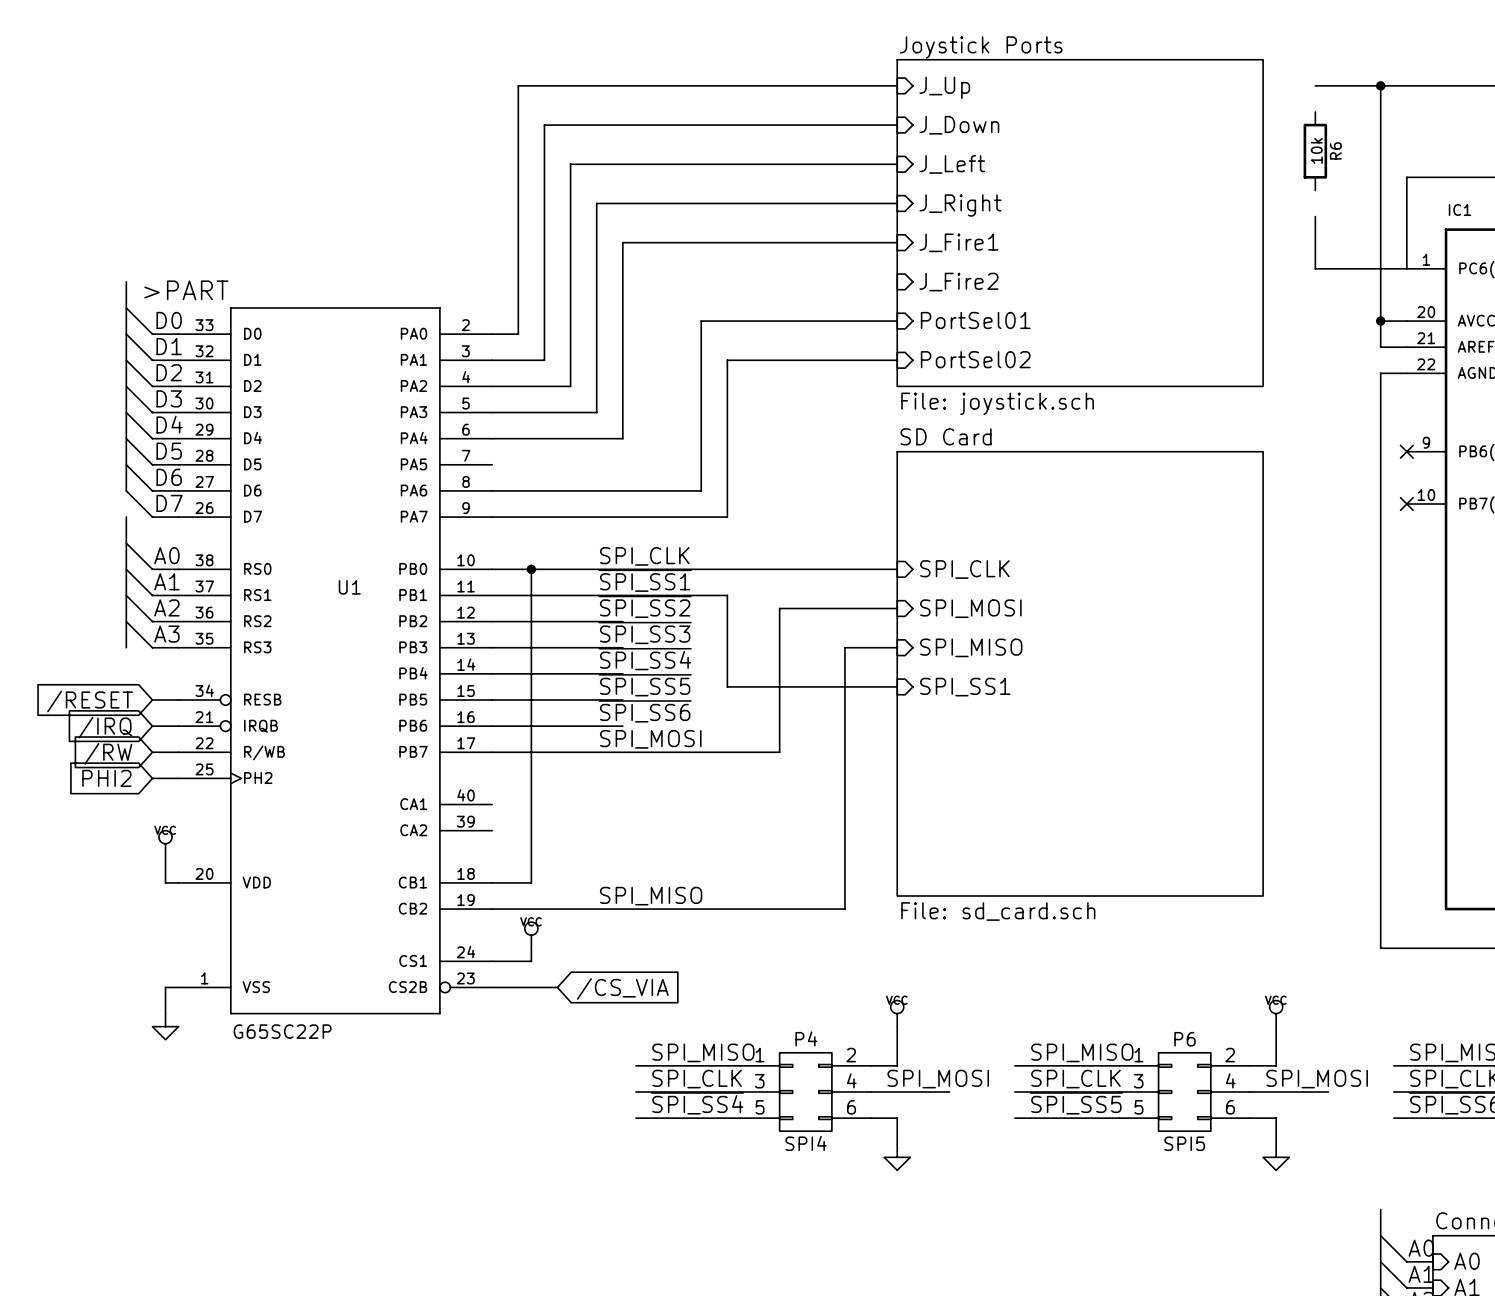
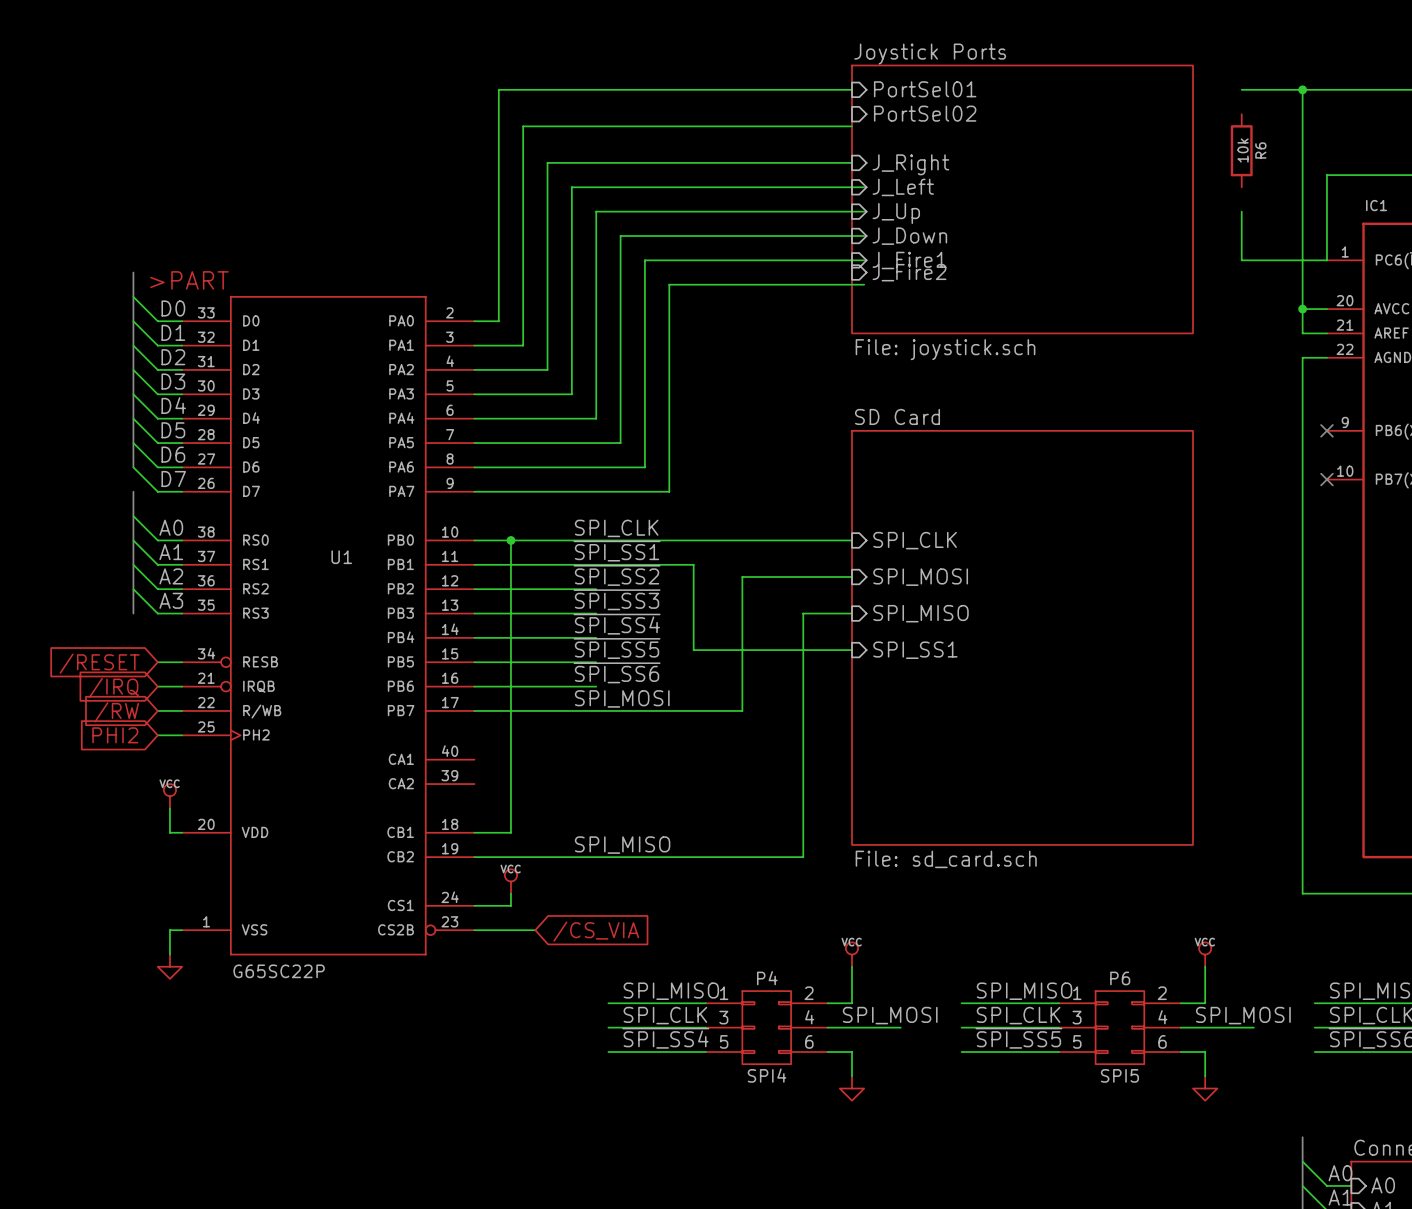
sheet pin: J_Up (944, 87) -> PortSel01 (925, 89)
sheet pin: J_Down (959, 125) -> none
sheet pin: J_Left (952, 164) -> J_Right (910, 164)
sheet pin: none -> J_Left (903, 187)
wire: (596, 203) (897, 203) -> (571, 199) (571, 187) (864, 187)
sheet Joystick Ports: none -> File: joystick.sch (1022, 199)
sheet pin: J_Right (960, 205) -> none
wire: none -> (864, 211) (596, 211) (596, 235)
sheet pin: none -> J_Up (896, 213)
sheet Joystick Ports: File: joystick.sch (1080, 223) -> none
wire: (622, 242) (648, 242) -> (474, 443) (620, 443) (620, 235)
wire: none -> (851, 235) (864, 235)
sheet pin: J_Fire1 (958, 242) -> J_Down (909, 236)
wire: none -> (864, 260) (644, 260) (644, 467)
sheet pin: none -> J_Fire1 (909, 260)
sheet pin: PortSel01 (975, 320) -> none
wire: (701, 321) (897, 321) -> (669, 309) (669, 284) (864, 284)
sheet pin position: PortSel02 (975, 359) -> PortSel02 (925, 113)
wire: (897, 360) (727, 360) (727, 517) (701, 517) -> none
wire: (675, 490) (701, 490) -> (669, 491) (669, 467)

